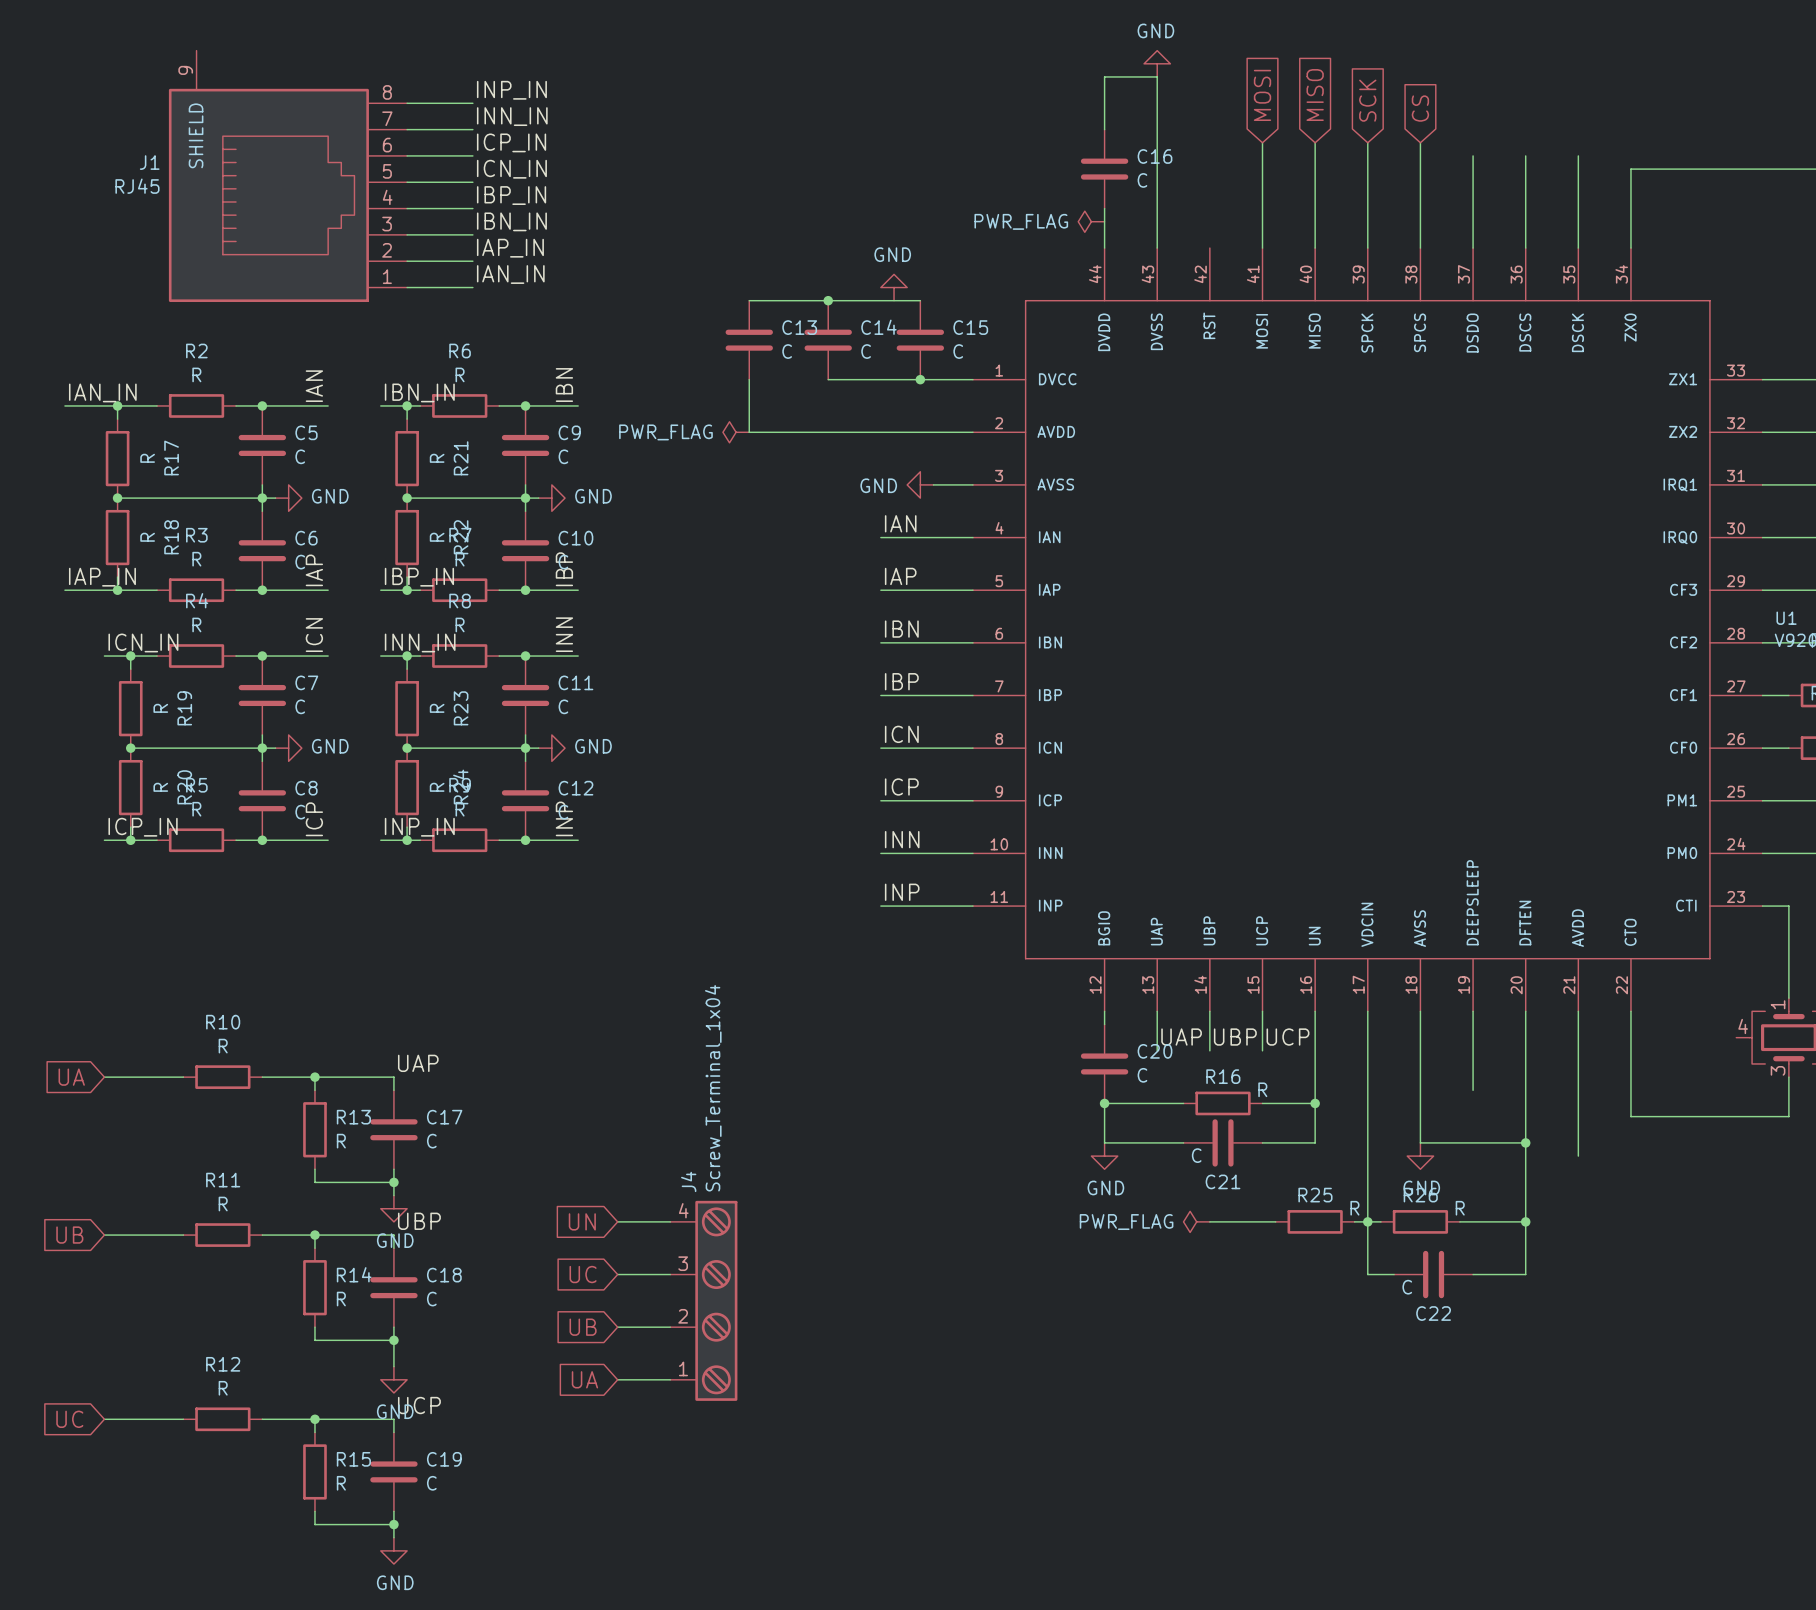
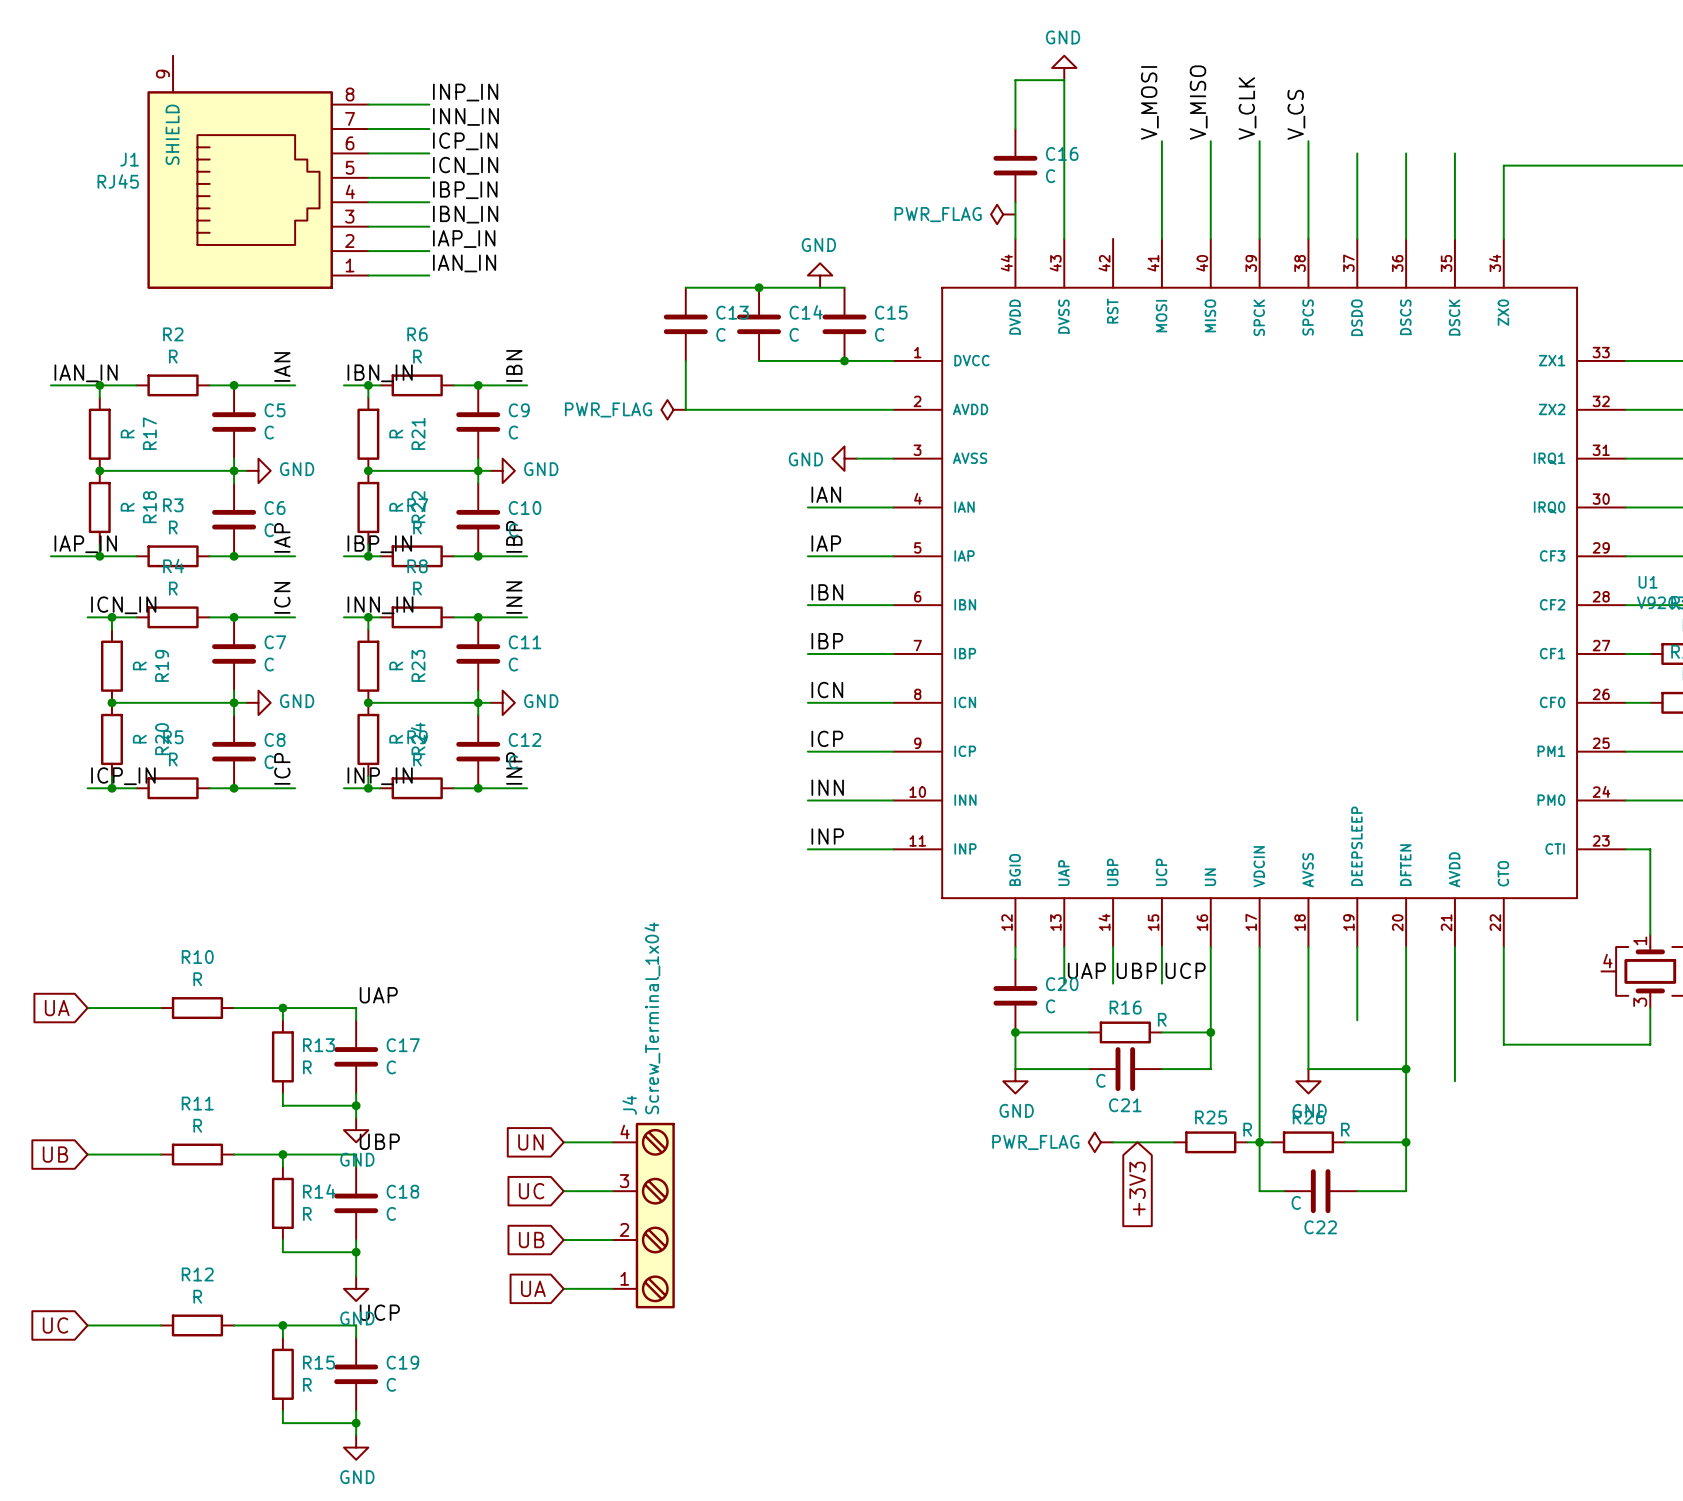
global label: MOSI (1262, 95) -> none
global label: MISO (1315, 95) -> none
global label: SCK (1367, 100) -> none
label: none -> V_MOSI (1149, 102)
label: none -> V_MISO (1198, 102)
label: none -> V_CLK (1247, 108)
global label: CS (1420, 108) -> none
label: none -> V_CS (1296, 114)
global label: none -> +3V3 (1137, 1188)

